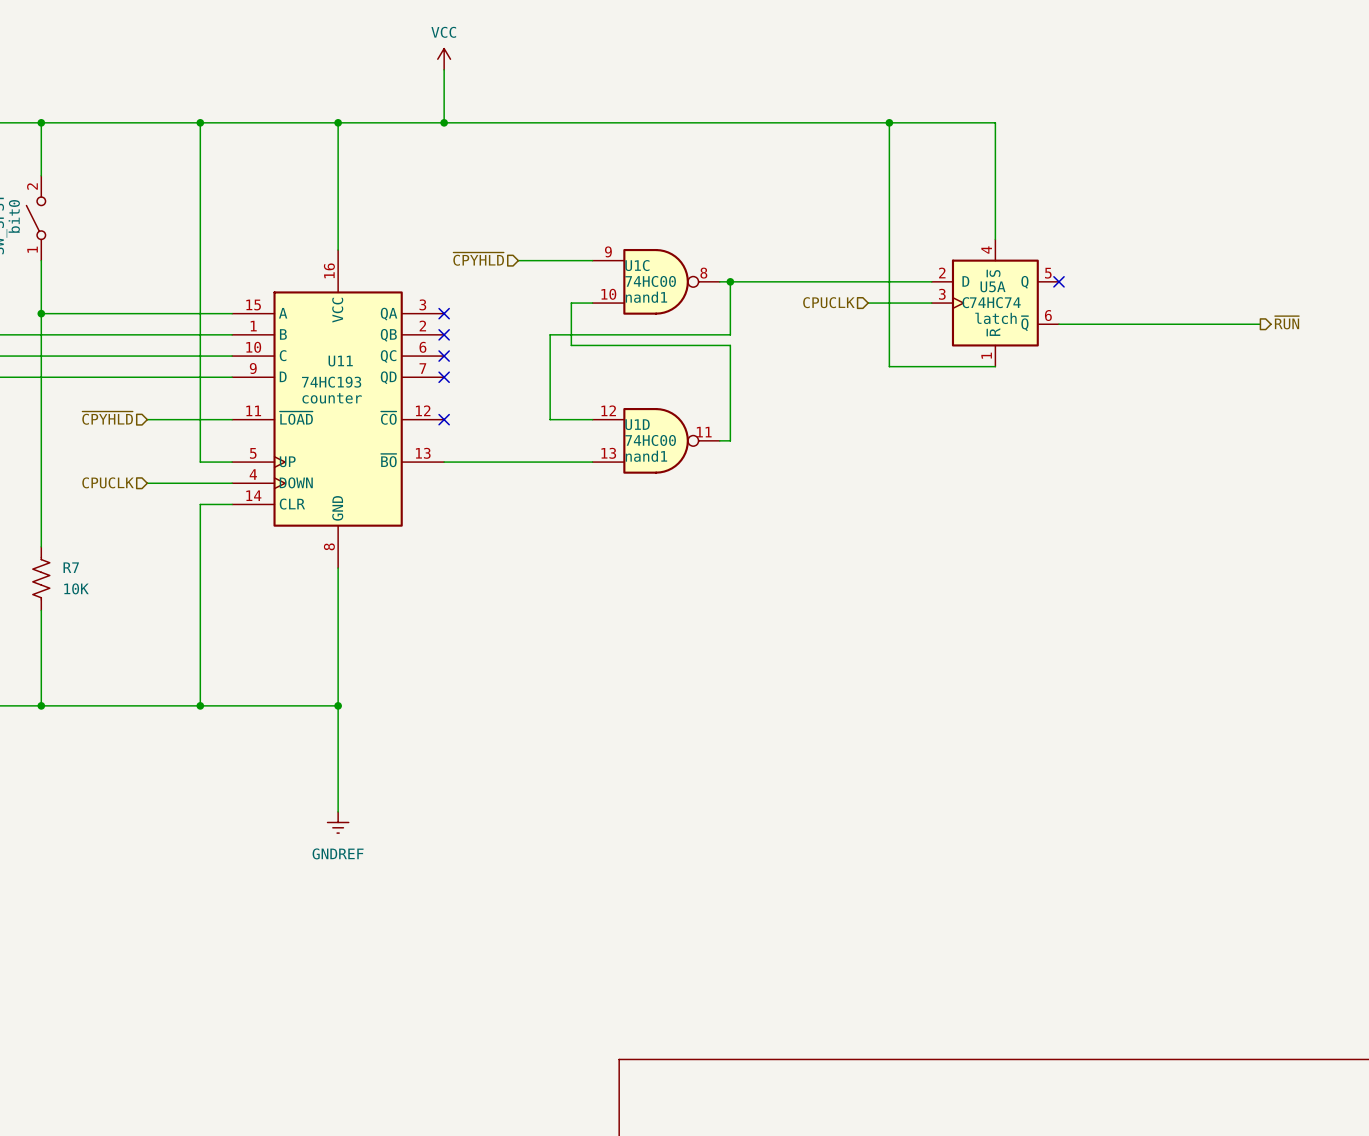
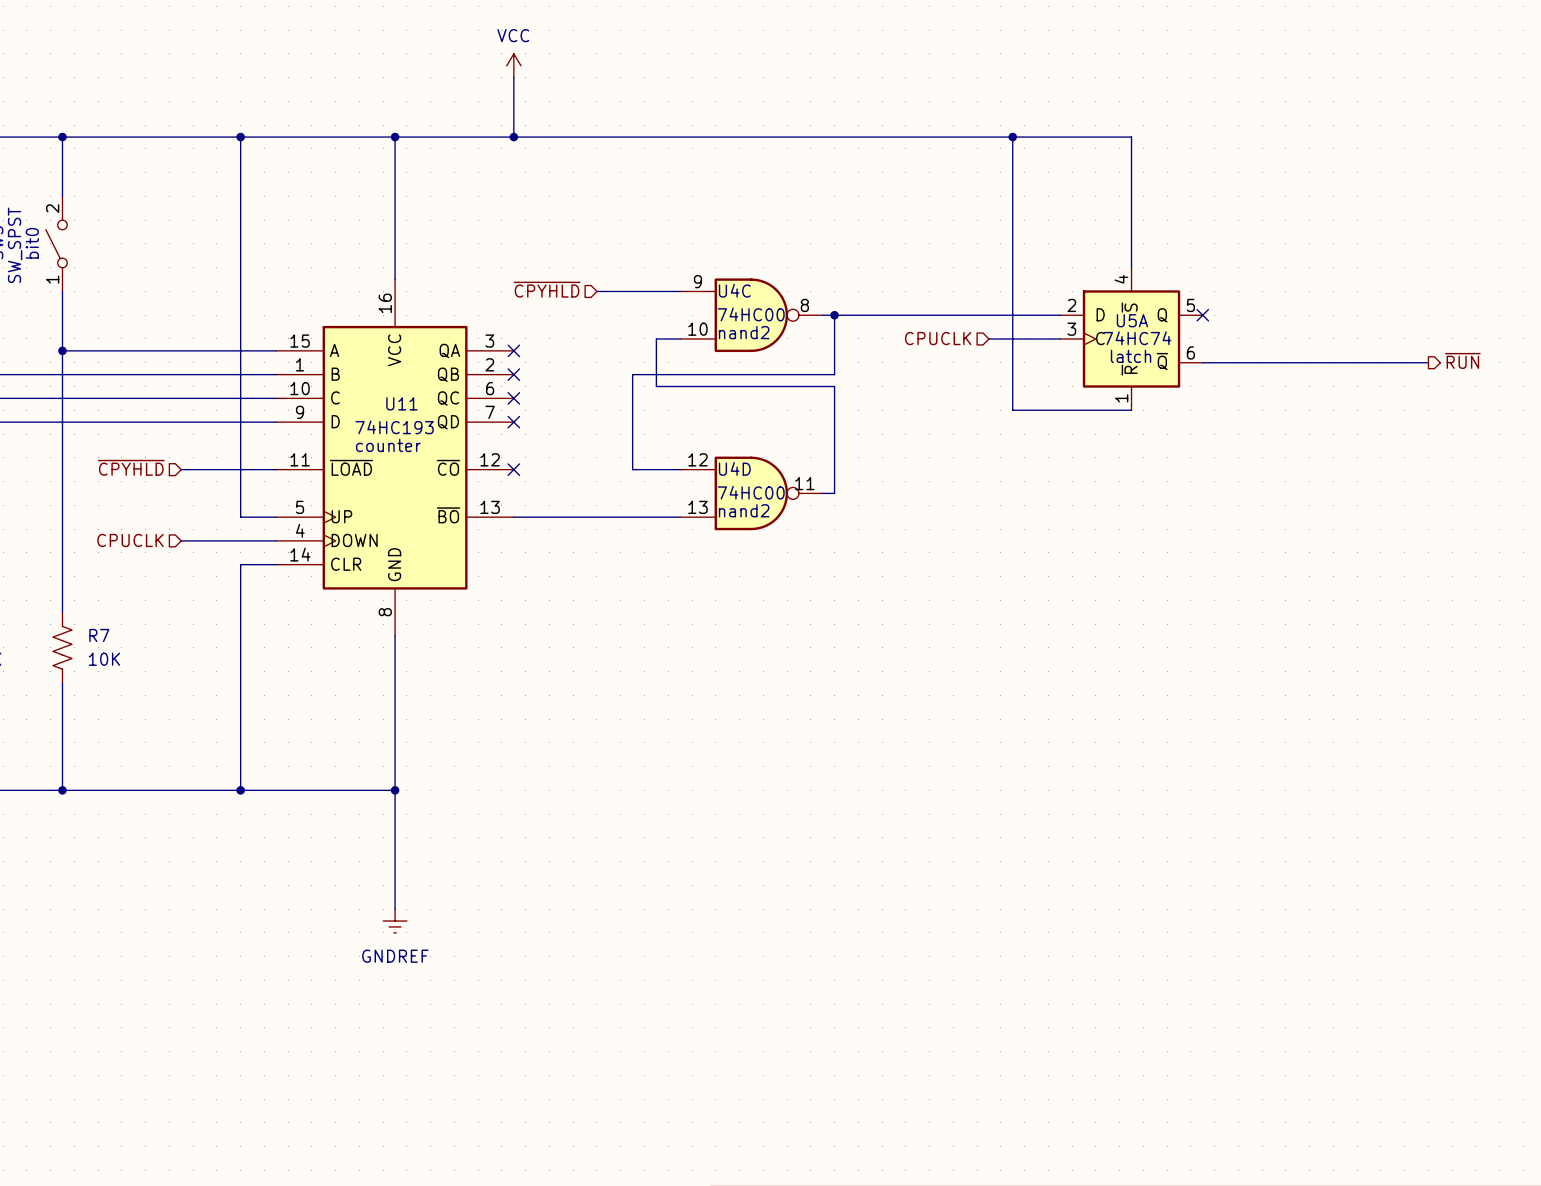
U1C name: U1C (637, 265) -> U4C (734, 290)
U1C text: nand1 (646, 297) -> nand2 (744, 332)
U1D name: U1D (637, 424) -> U4D (734, 468)
U1D text: nand1 (646, 456) -> nand2 (744, 510)

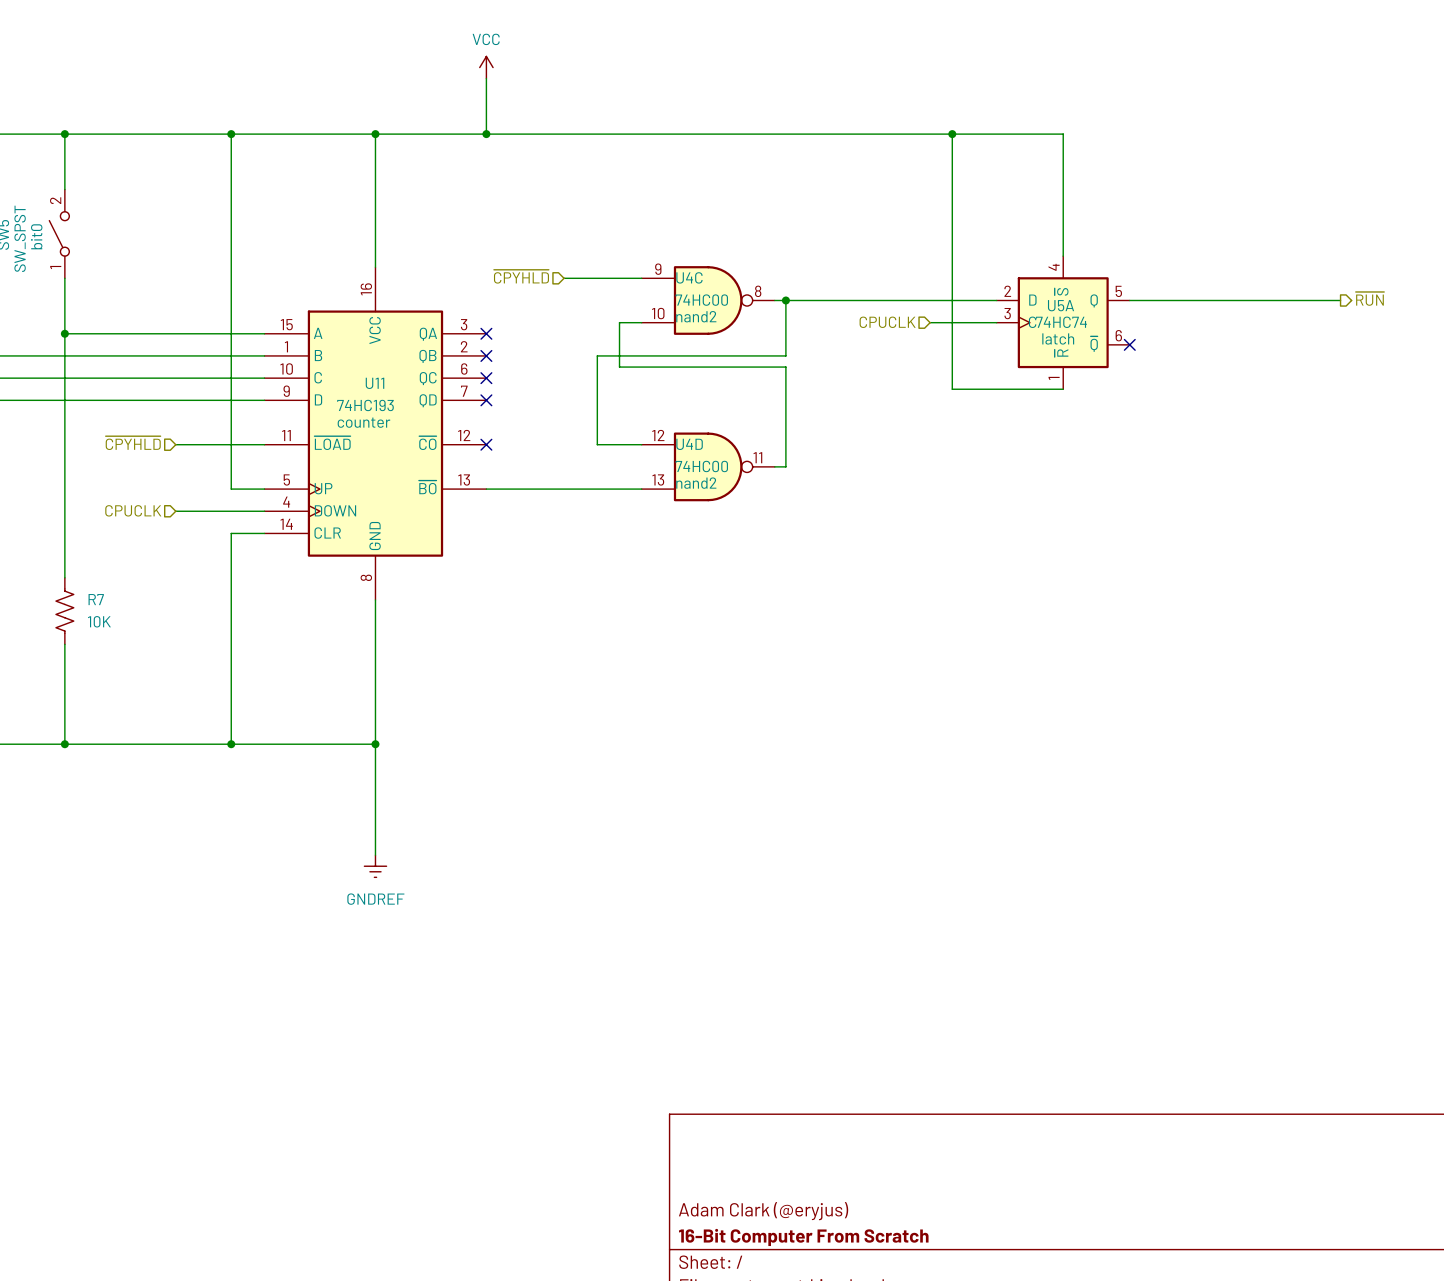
no-connect mark position: (1202, 315) -> (1129, 344)
hierarchical label position: ~{RUN} (1462, 360) -> ~{RUN} (1369, 298)
wire: (1202, 362) (1428, 362) -> (1129, 300) (1340, 300)

